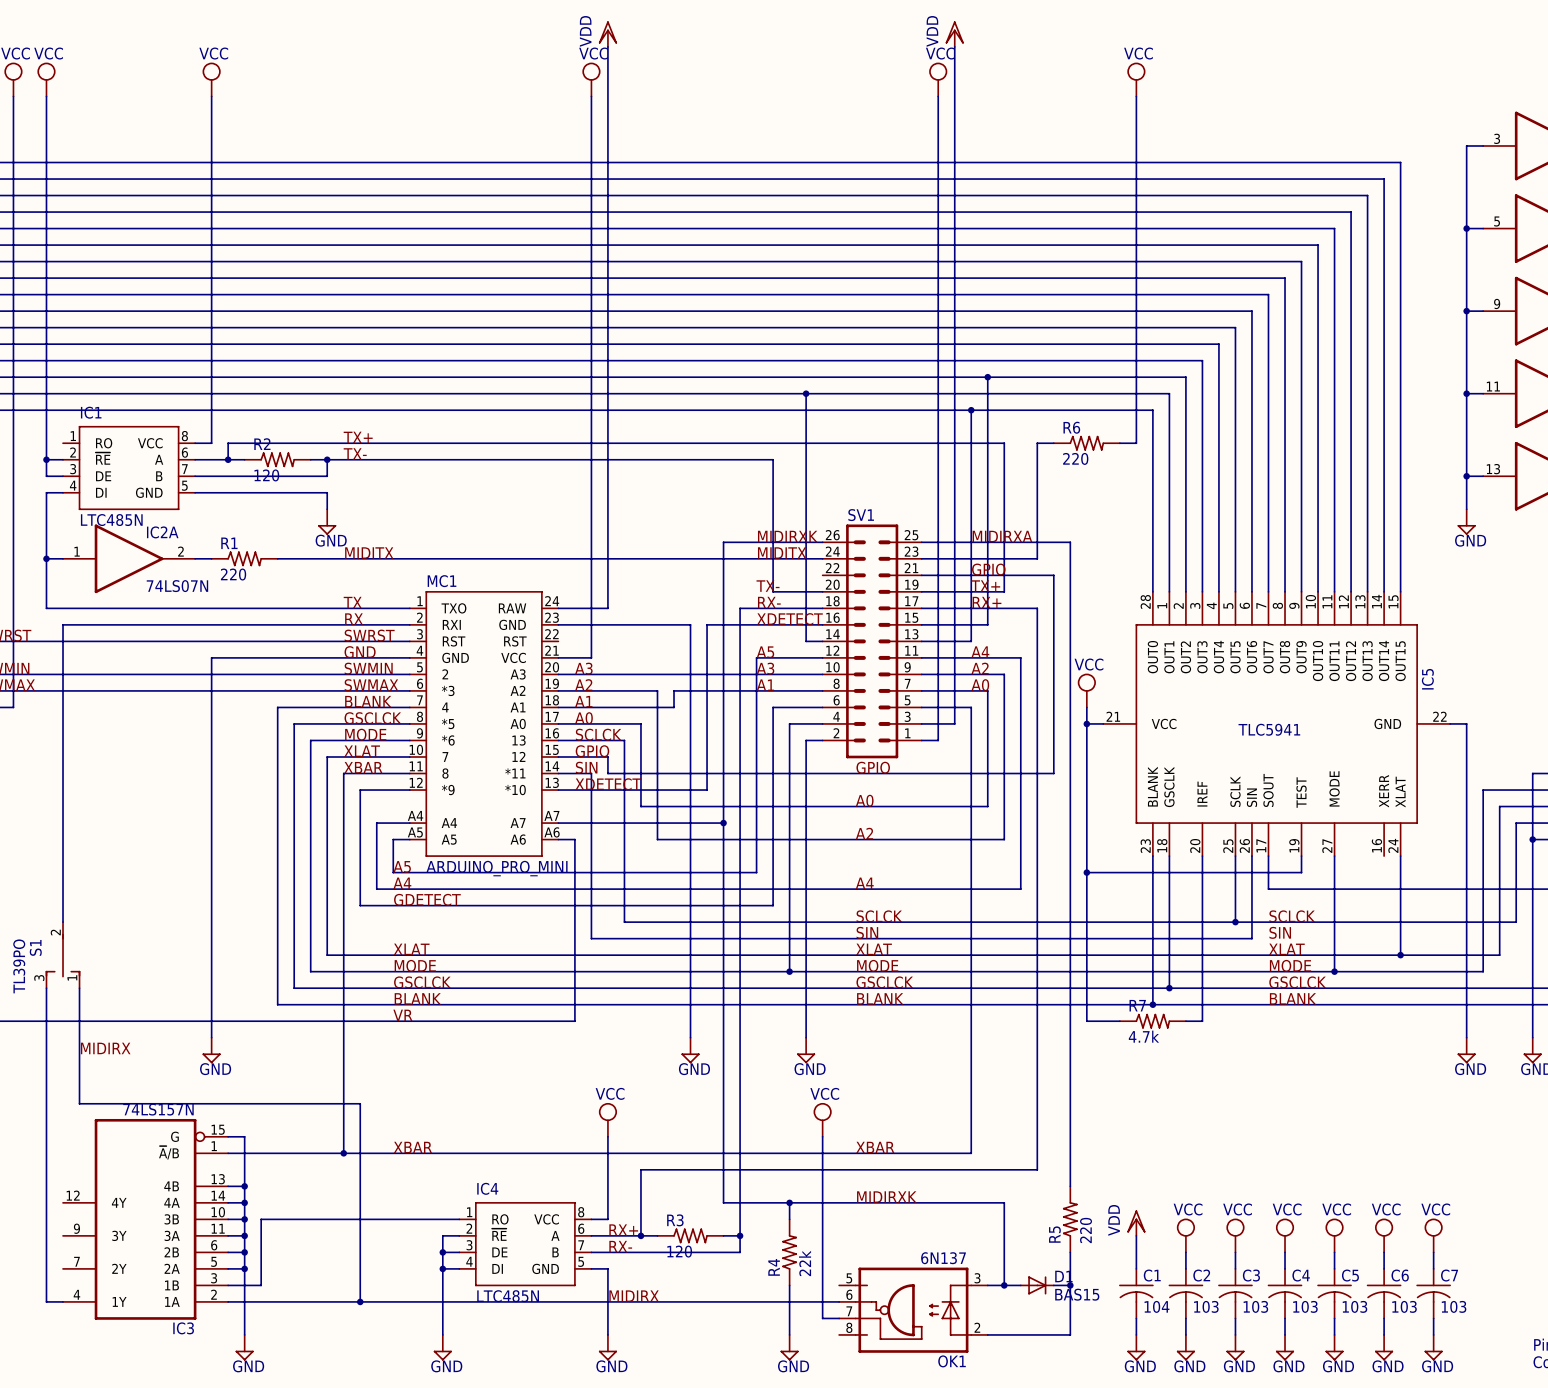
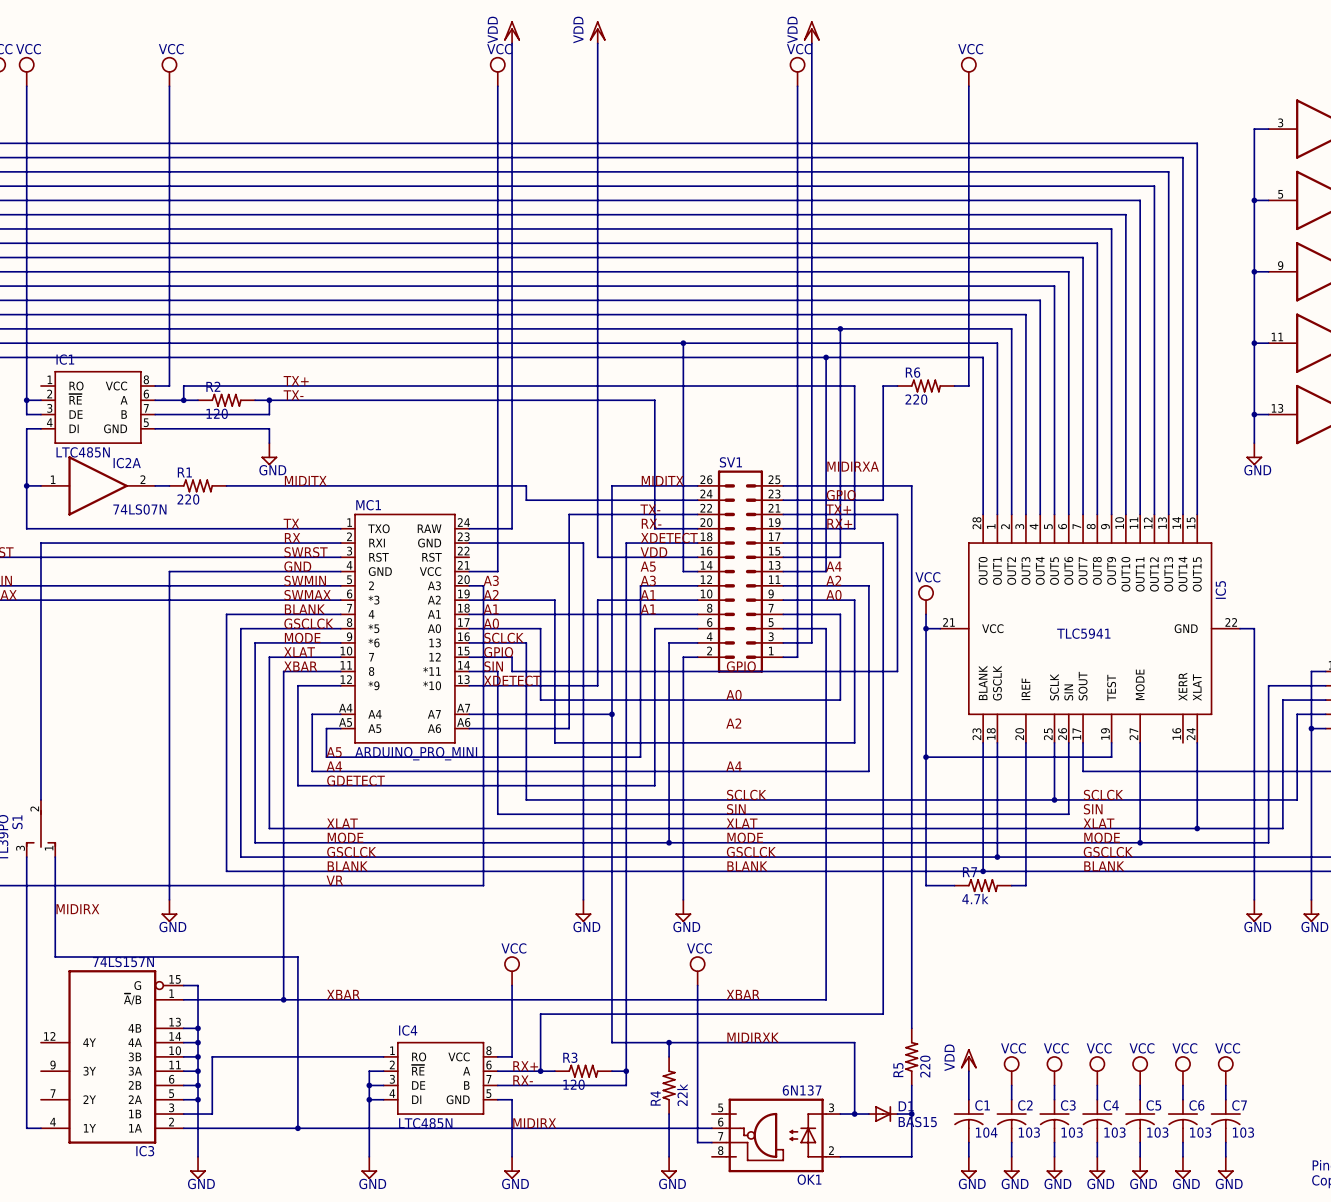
power symbol: none -> VDD (597, 32)
label: MIDIRXK (787, 536) -> none
wire: (822, 542) (723, 542) (723, 558) (624, 558) -> (697, 500) (526, 500) (526, 485)
wire: (921, 542) (1070, 542) (1070, 558) -> none
wire: (1037, 575) (1053, 575) (1053, 591) -> (883, 500) (883, 485) (911, 485)
wire: (773, 608) (740, 608) (740, 624) (707, 624) -> (597, 43) (597, 543)
wire: (1004, 608) (1037, 608) (1037, 624) -> (854, 528) (854, 514) (897, 514)
label: none -> VDD (653, 552)
wire: (707, 641) (707, 690) (674, 690) -> (654, 528) (654, 514) (569, 514) (569, 600)
SV1 position: (872, 641) -> (740, 571)
wire: (806, 657) (756, 657) (756, 674) (574, 674) -> (683, 571) (683, 557) (597, 557)
wire: (971, 657) (1020, 657) (1020, 674) -> (826, 571) (826, 557) (840, 557) (840, 543) (883, 543)
wire: (1004, 674) (1004, 690) -> (854, 585) (868, 585)
wire: (987, 690) (987, 707) -> (840, 600) (854, 600)
label: none -> A1 (648, 609)
wire: (773, 707) (773, 723) -> (669, 628) (654, 628)
wire: none -> (654, 614) (569, 614) (569, 728)
wire: (971, 707) (971, 723) -> (826, 614) (840, 614)
wire: (789, 723) (789, 740) -> none
wire: none -> (826, 628) (811, 628) (811, 642) (797, 642) (797, 657) (783, 657)
wire: (806, 740) (806, 756) -> (683, 642) (669, 642)
wire: none -> (683, 657) (697, 657)
wire: (674, 839) (1004, 839) -> (483, 585) (483, 728) (554, 728) (554, 742) (854, 742) (854, 728)

